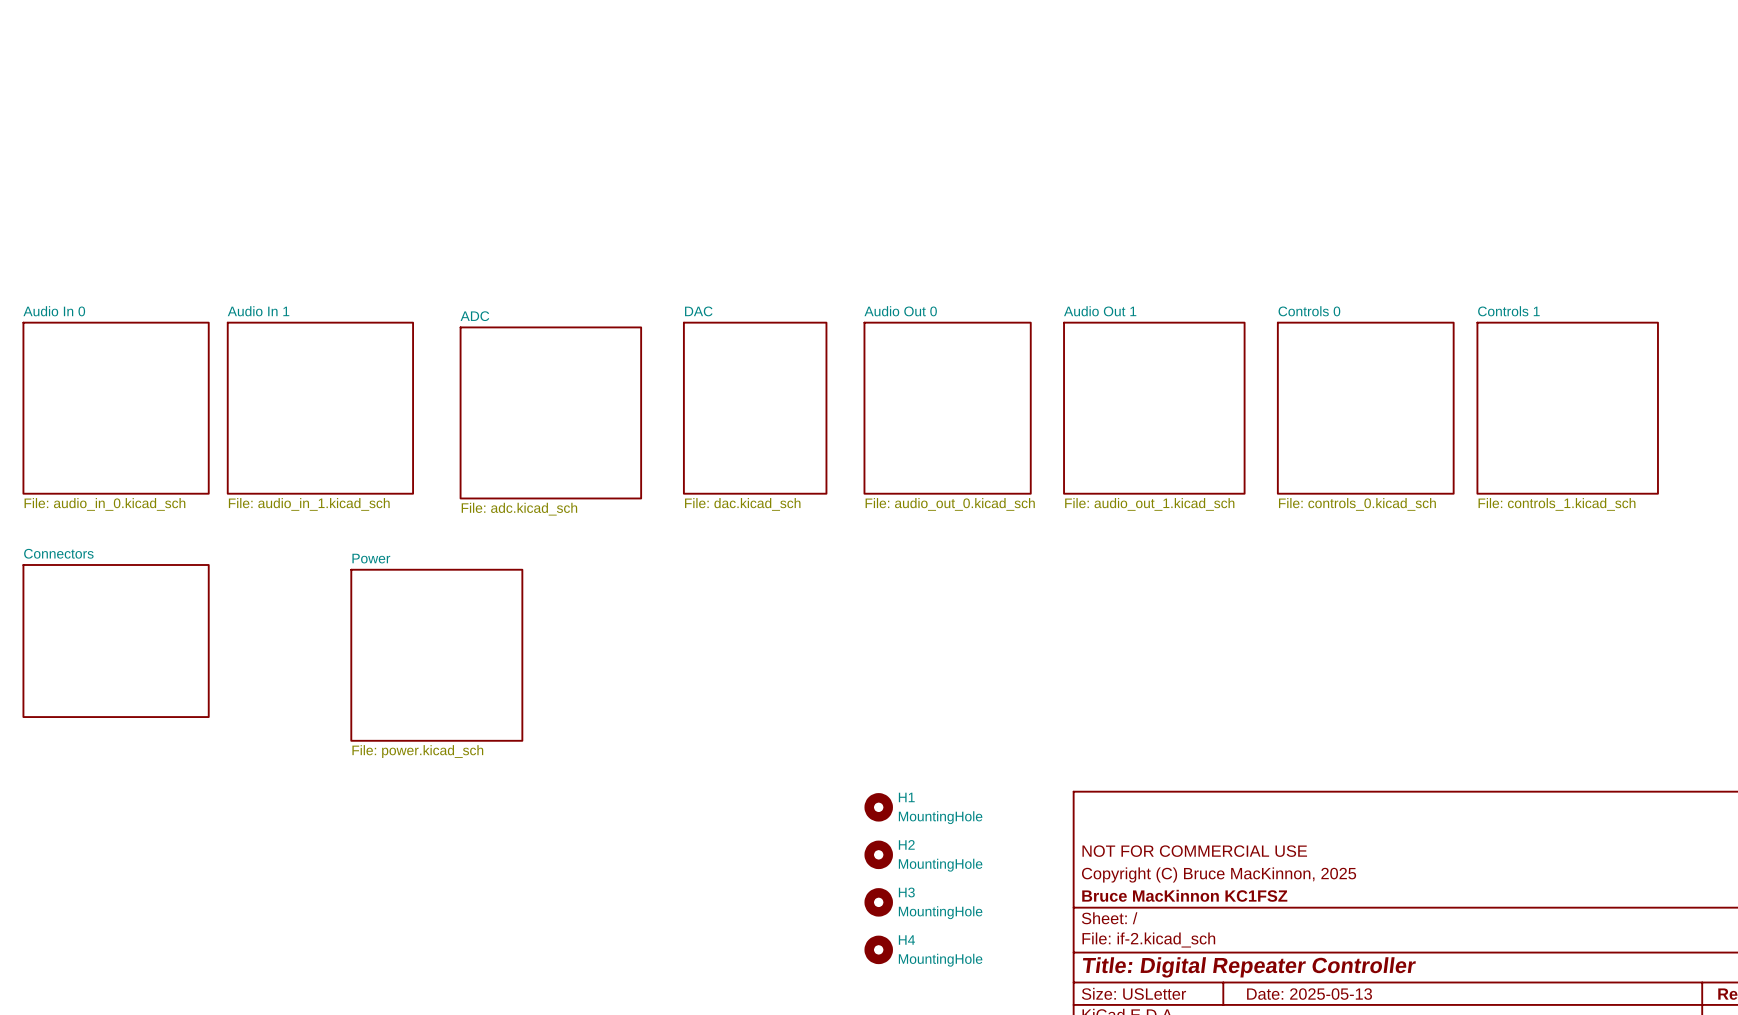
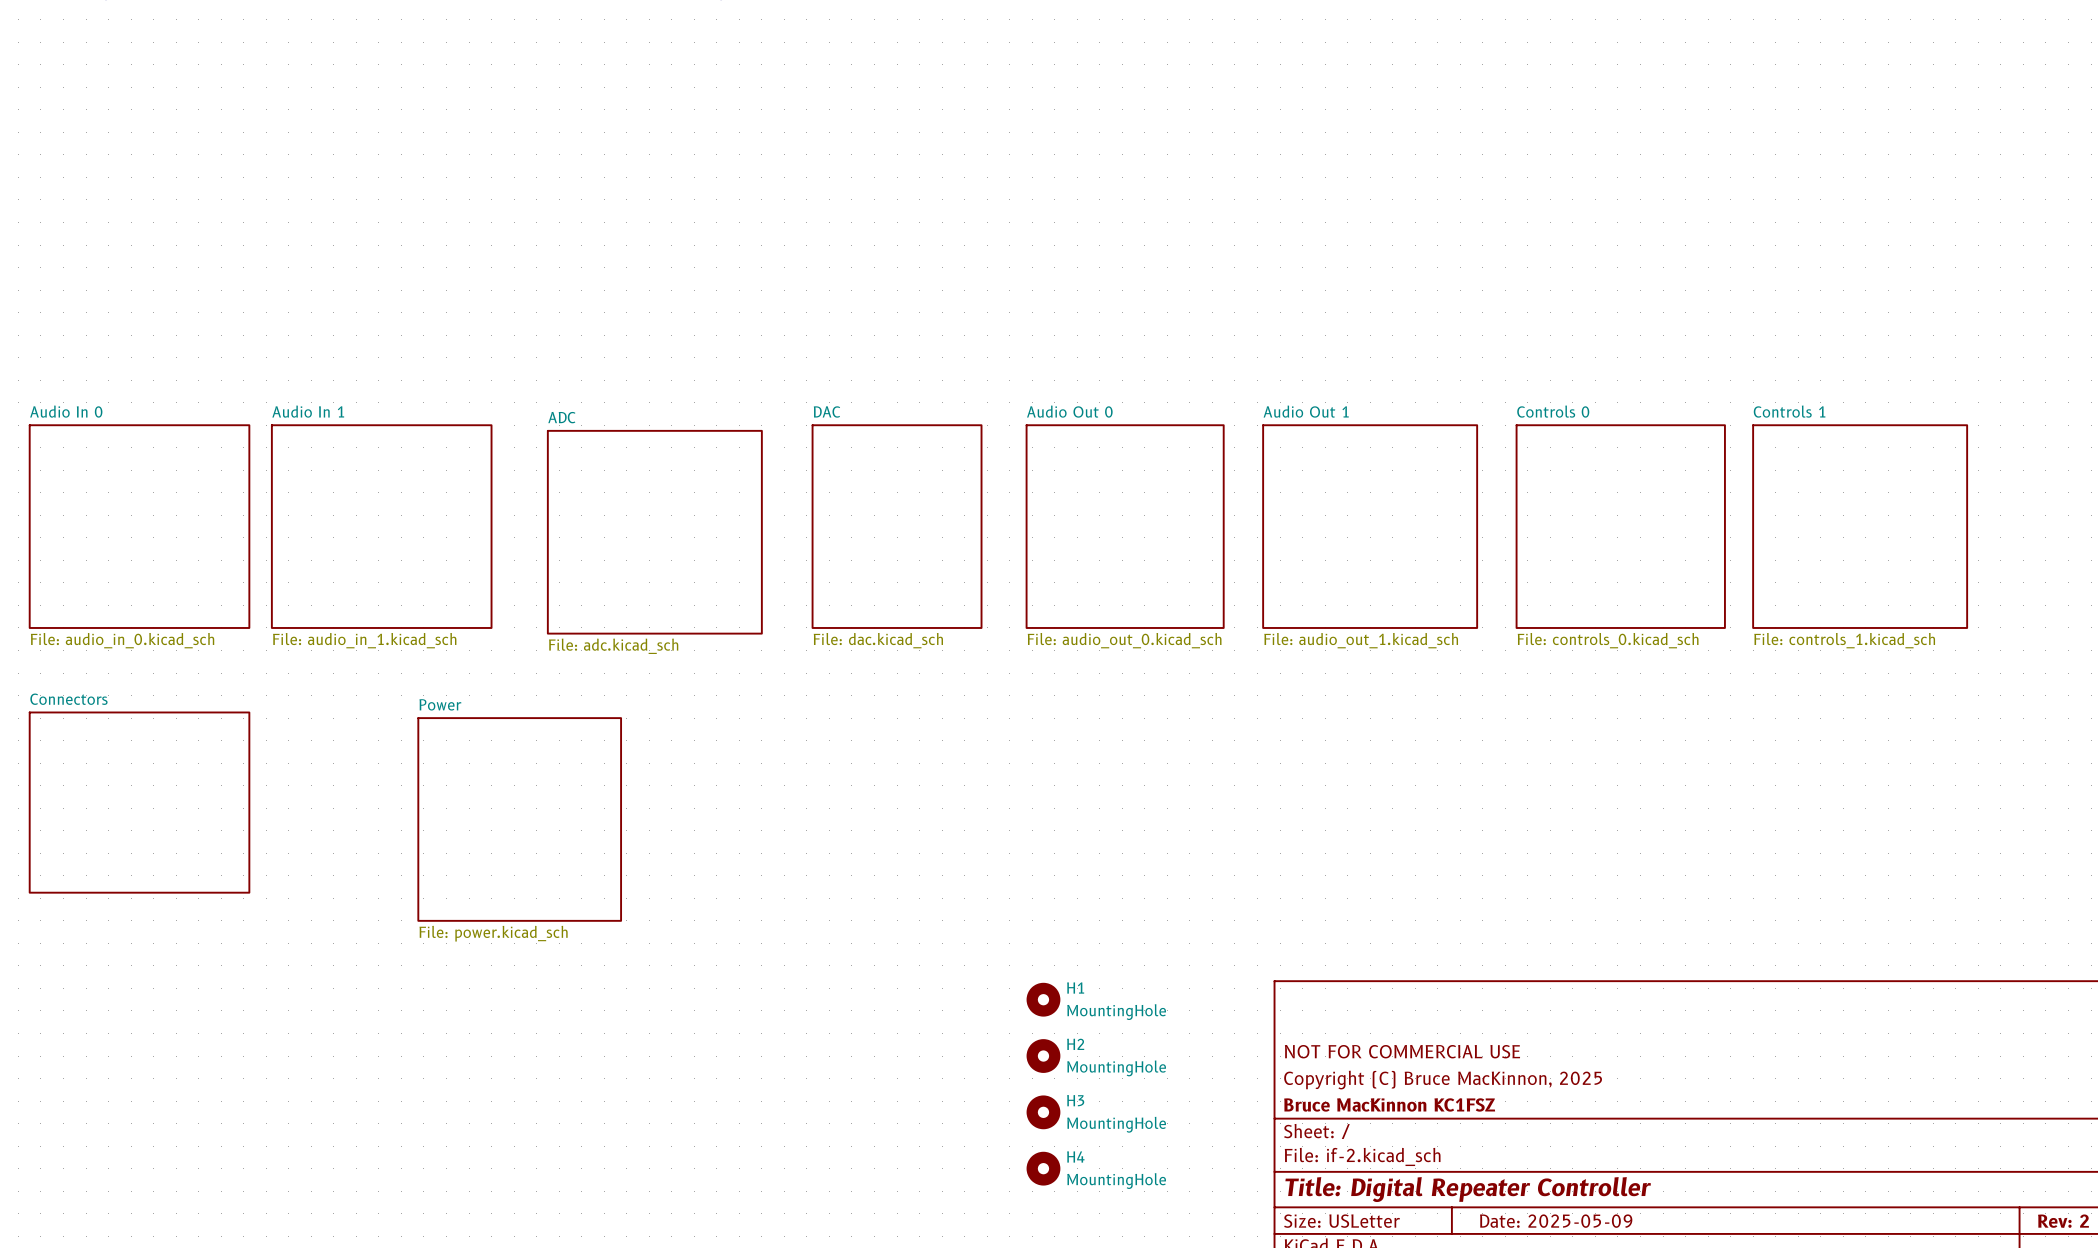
title block: Date: 2025-05-13 (1309, 994) -> Date: 2025-05-09 (1556, 1221)

